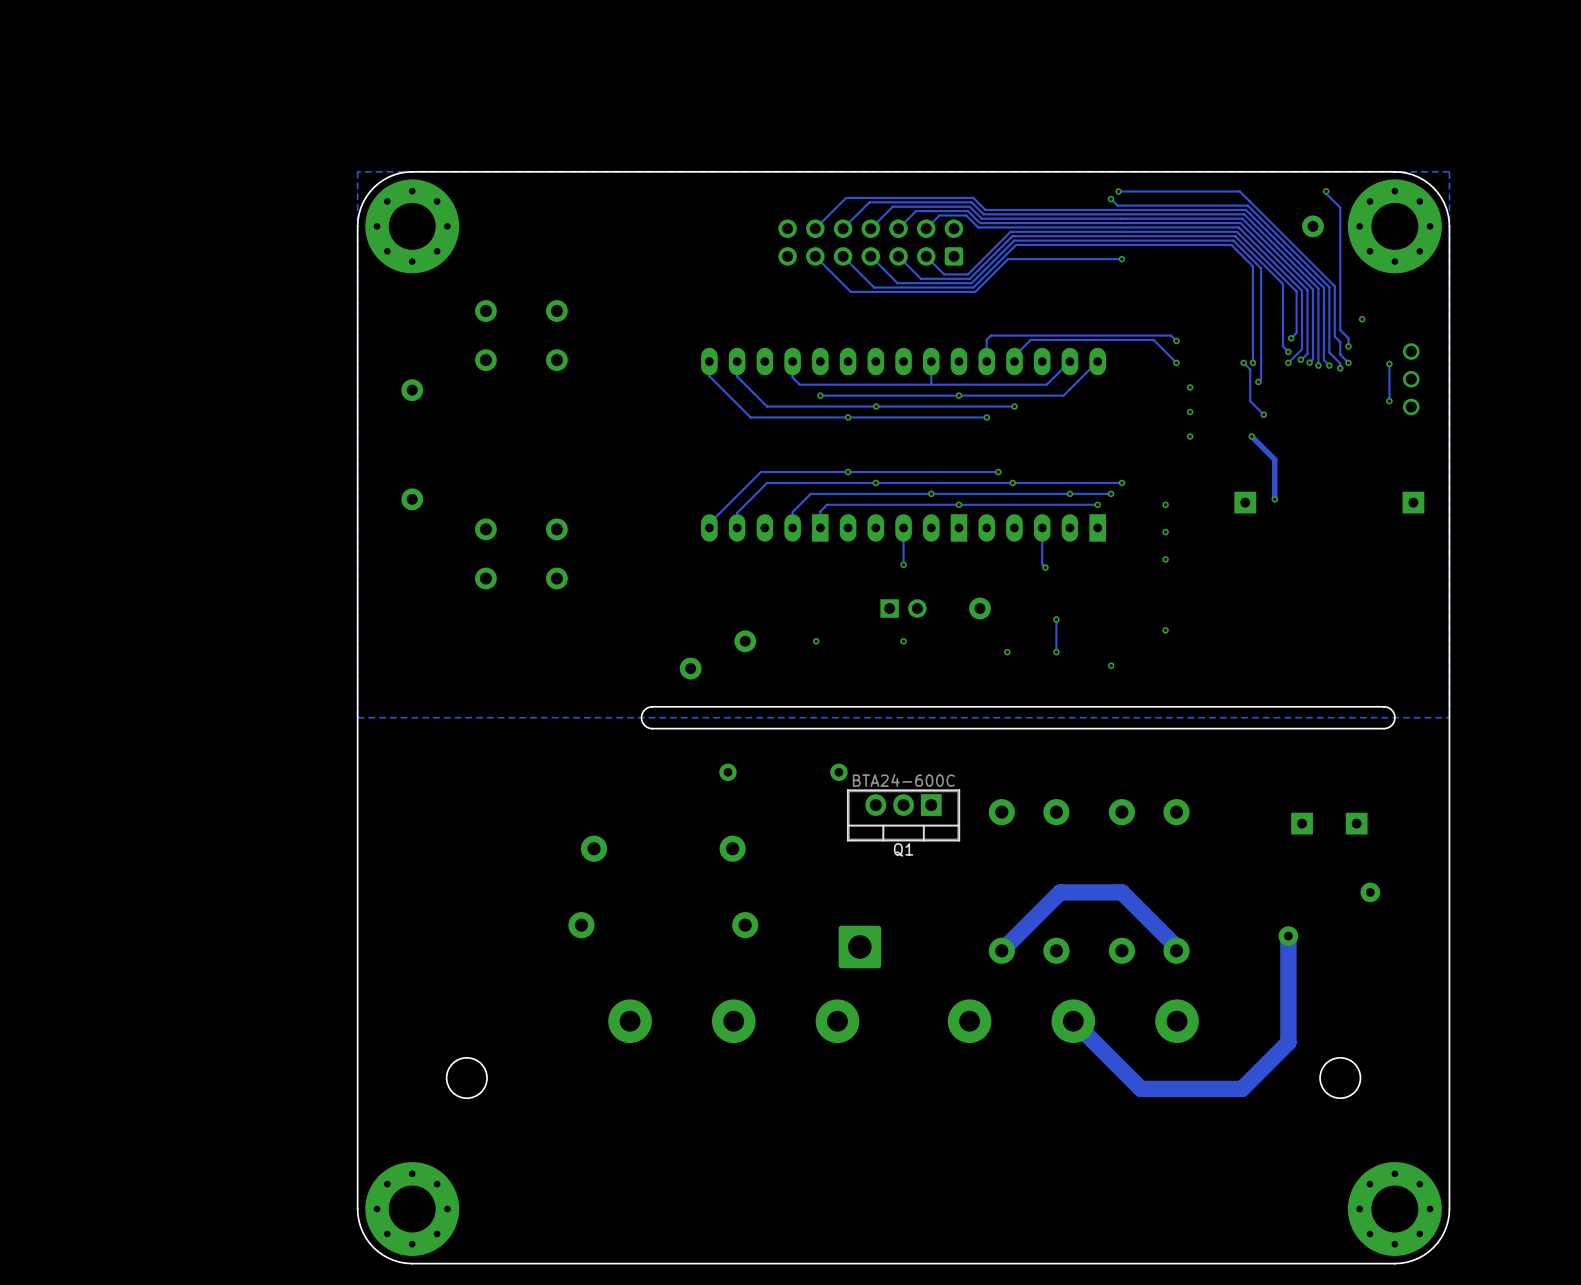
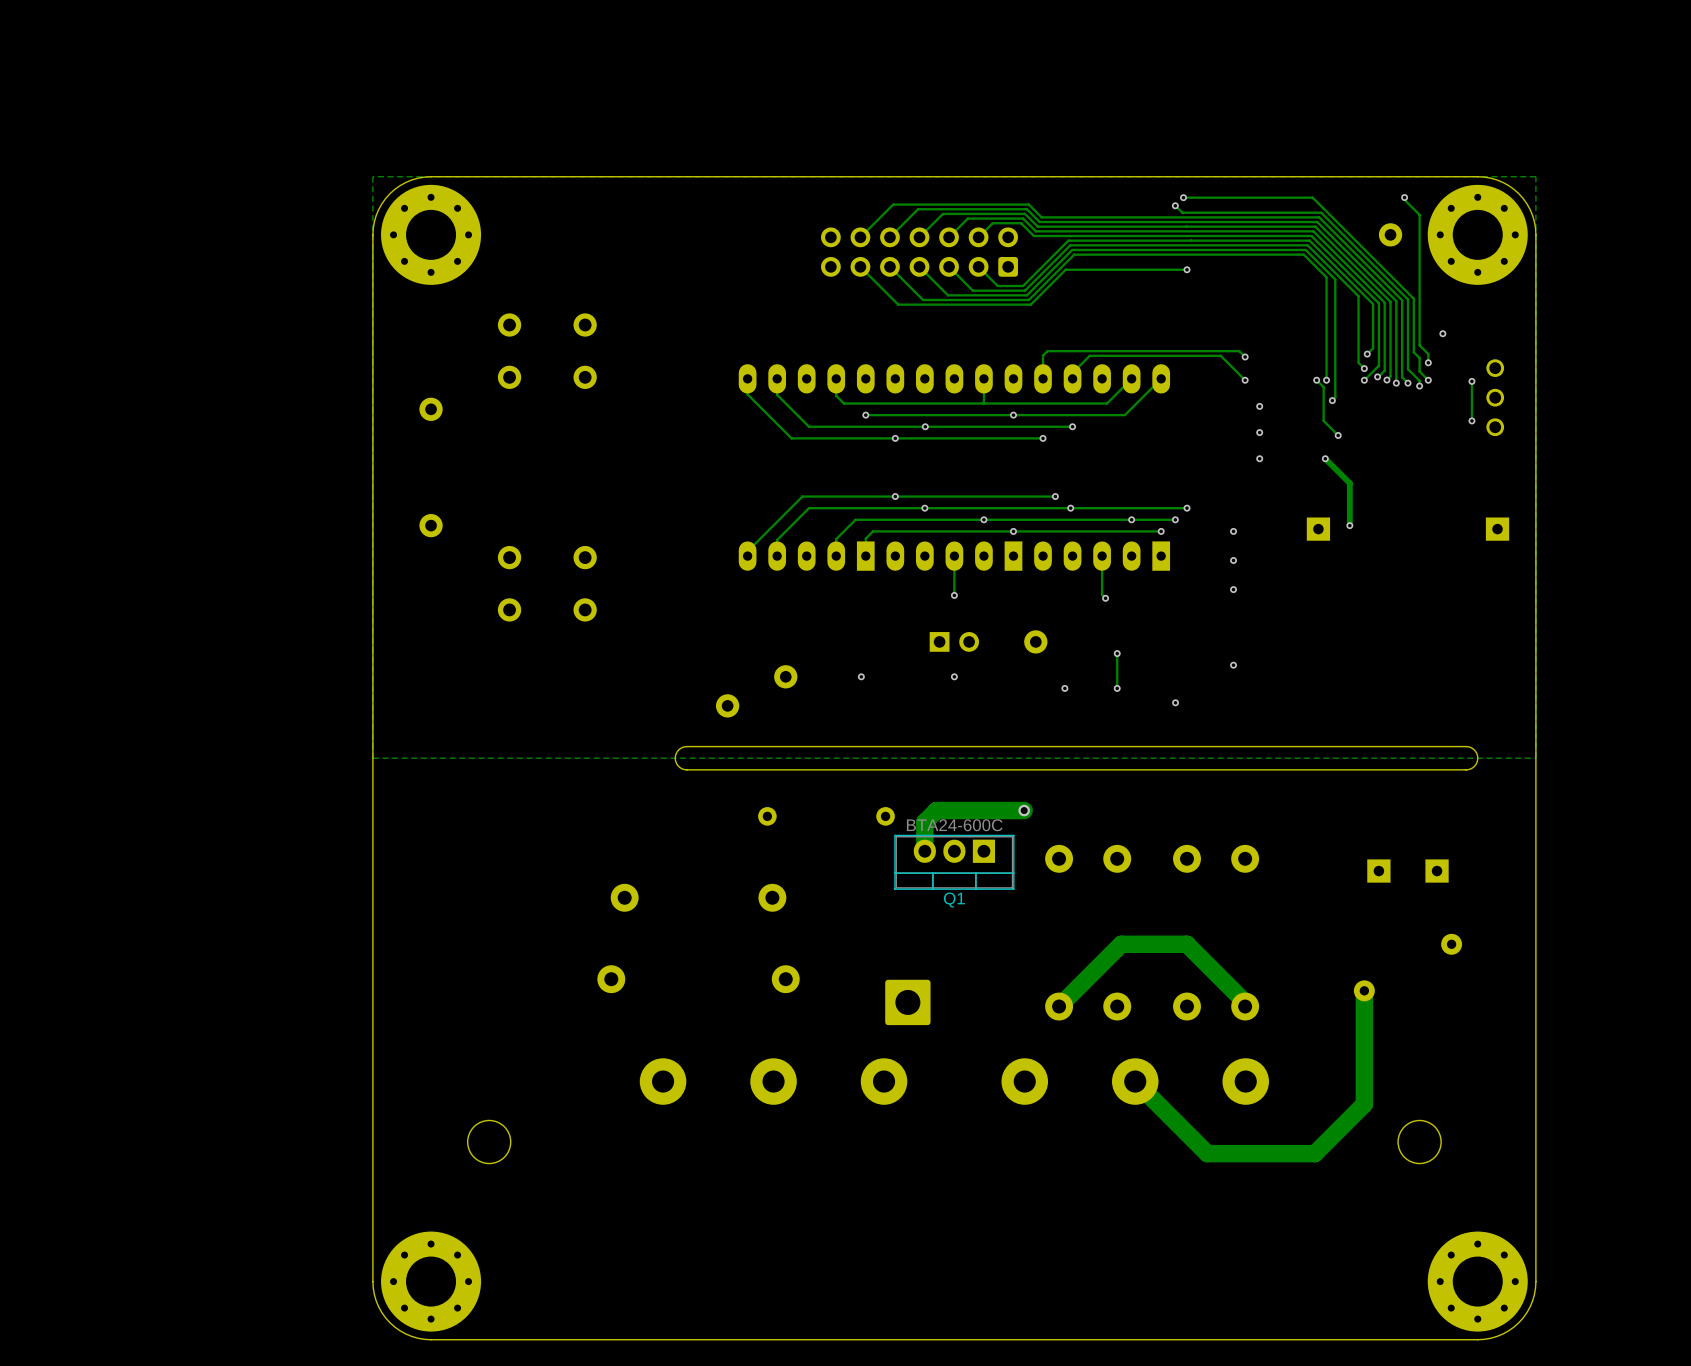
track: none -> (1024, 810) (936, 810) (924, 822) (924, 851)
via: none -> (1024, 810)

